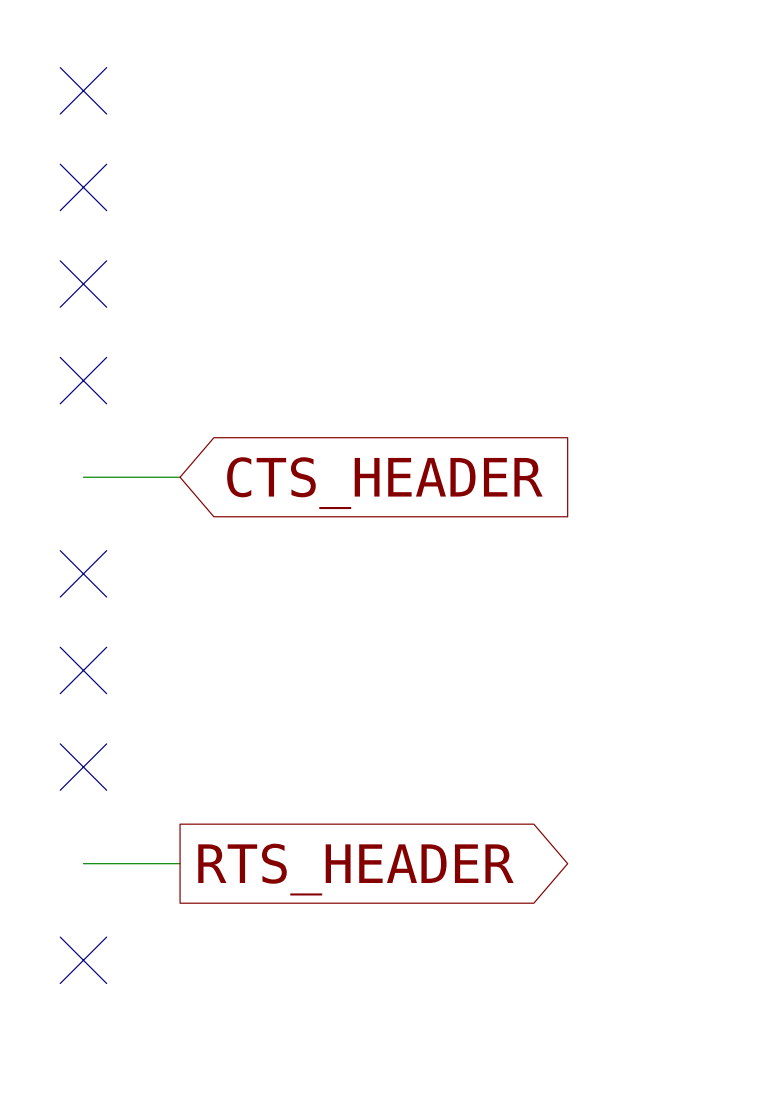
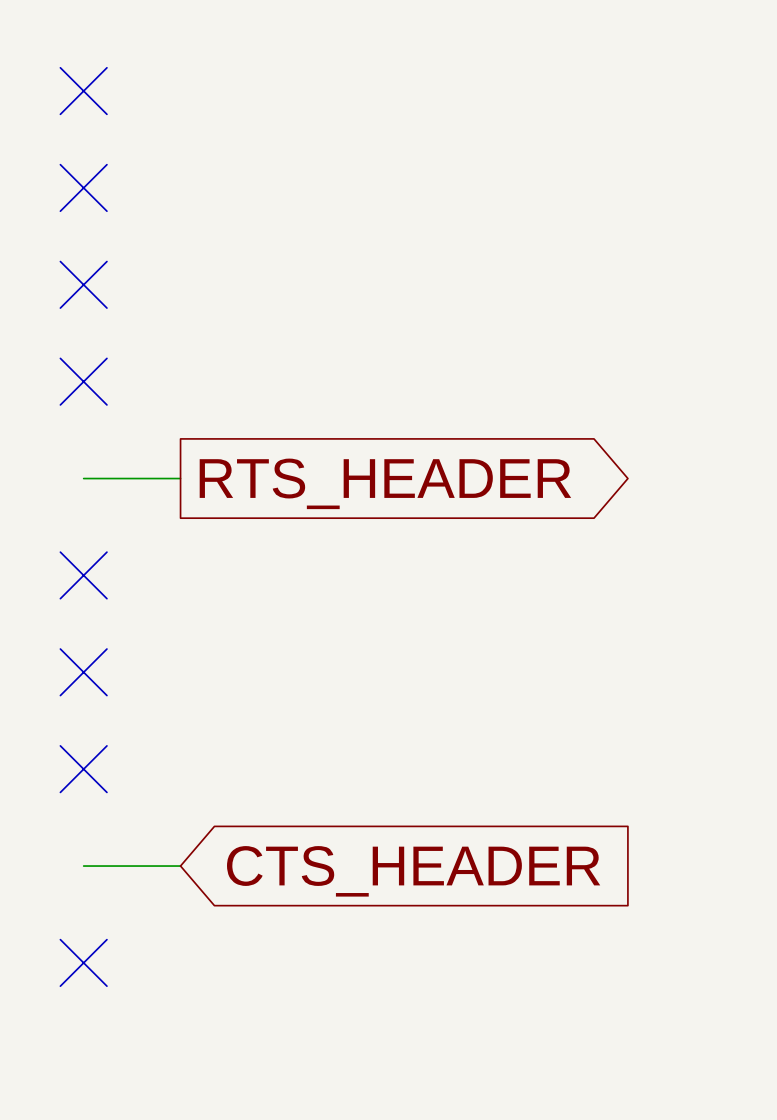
global label shape: input (384, 483) -> output (385, 483)
global label: CTS_HEADER (384, 483) -> RTS_HEADER (385, 483)
global label shape: output (355, 869) -> input (413, 871)
global label: RTS_HEADER (355, 869) -> CTS_HEADER (413, 871)

